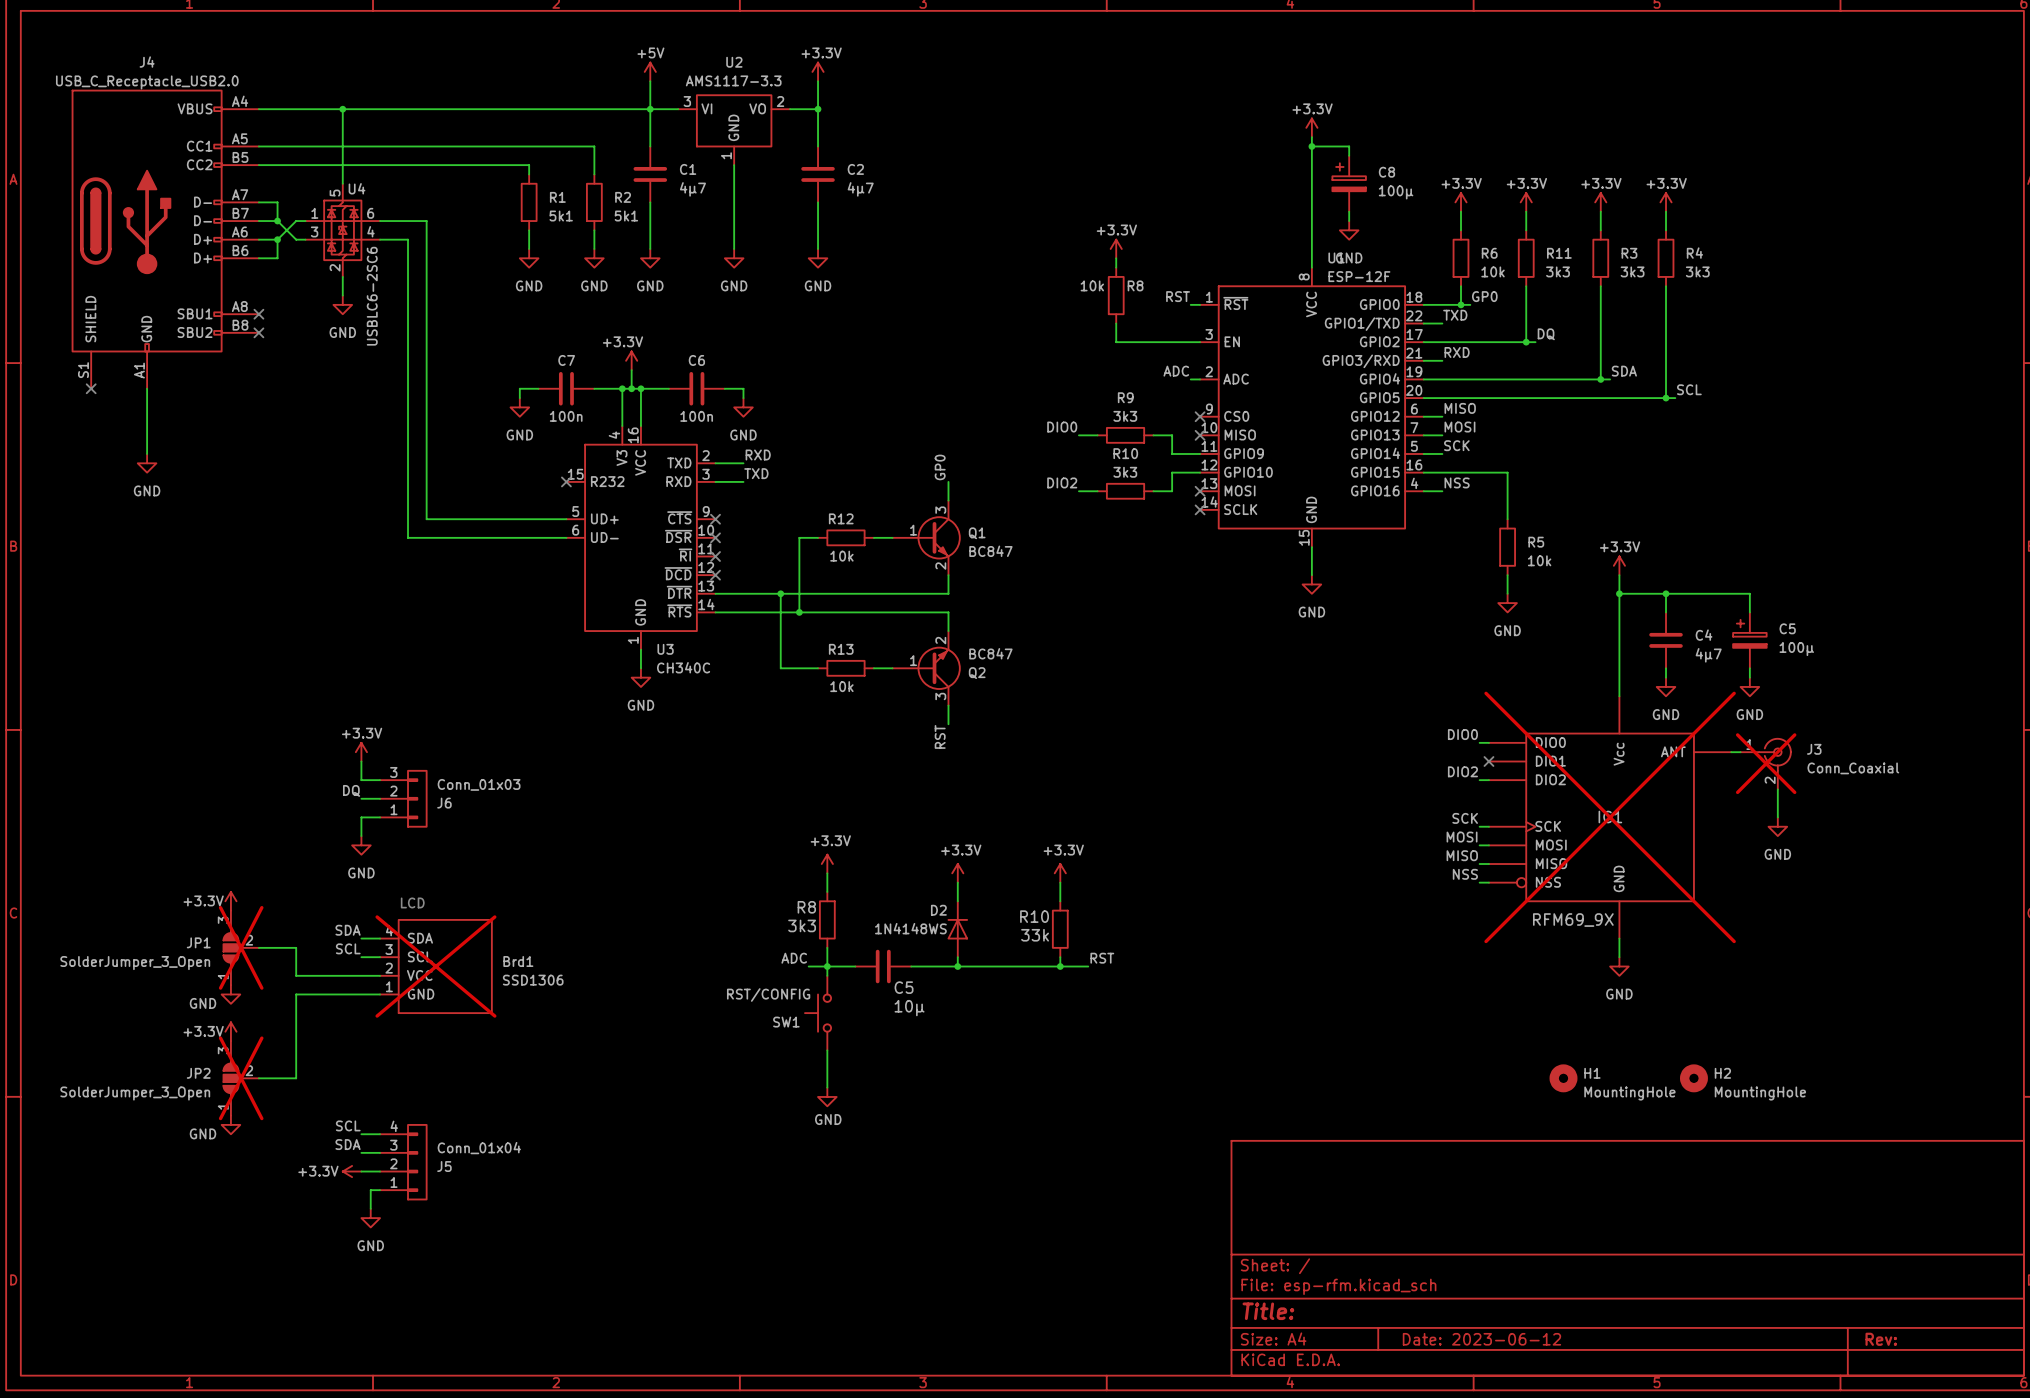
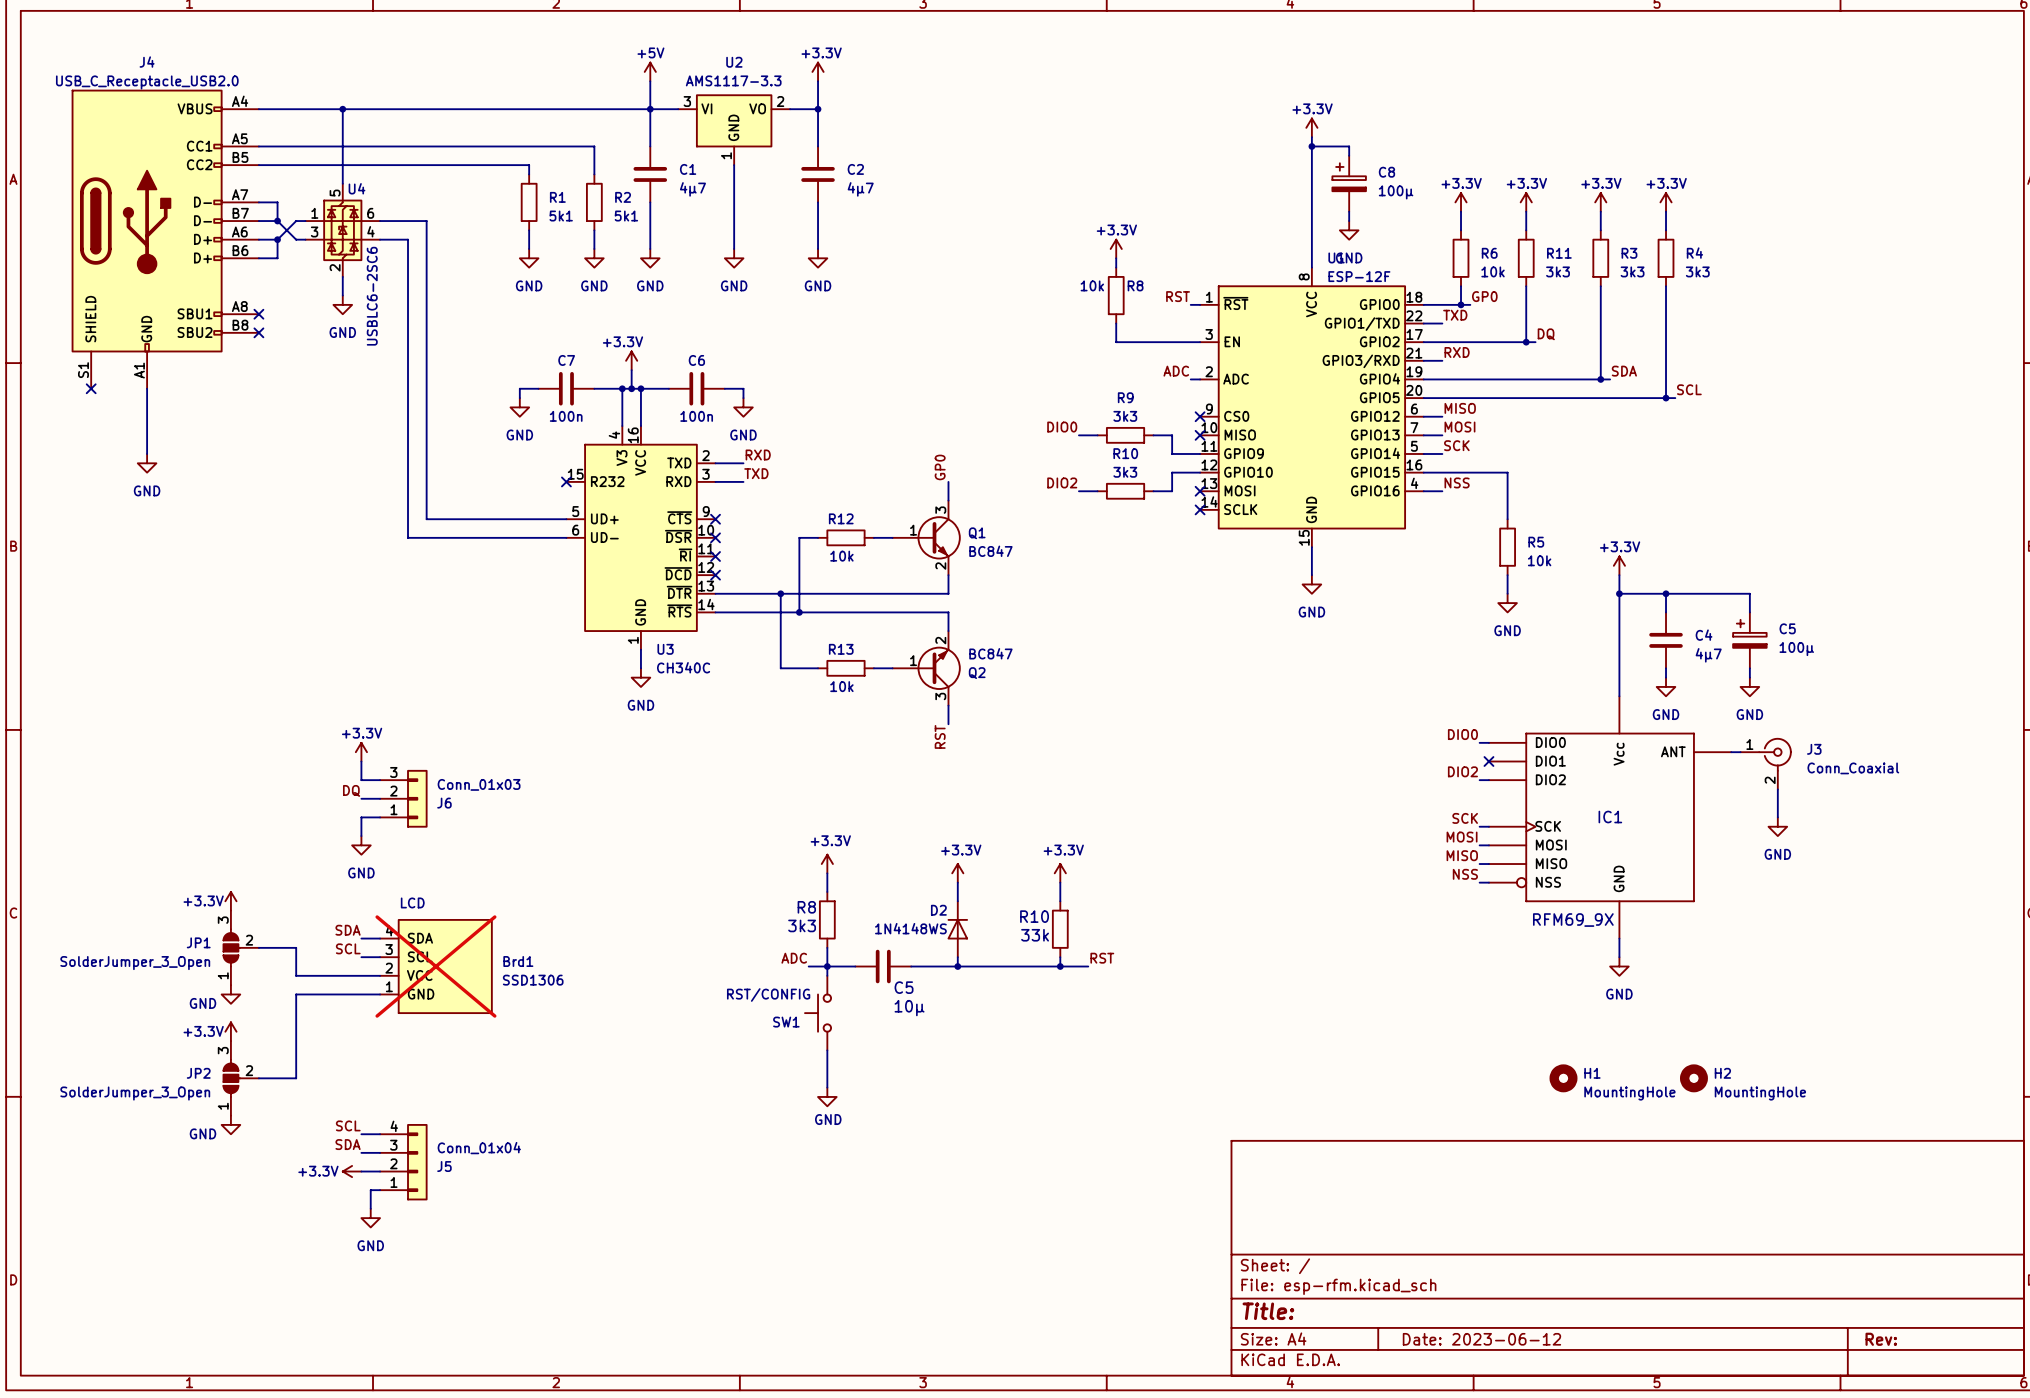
J3 do-not-place cross: (1766, 763) -> none
IC1 do-not-place cross: (1610, 817) -> none
JP1 do-not-place cross: (241, 947) -> none
JP2 do-not-place cross: (241, 1078) -> none

